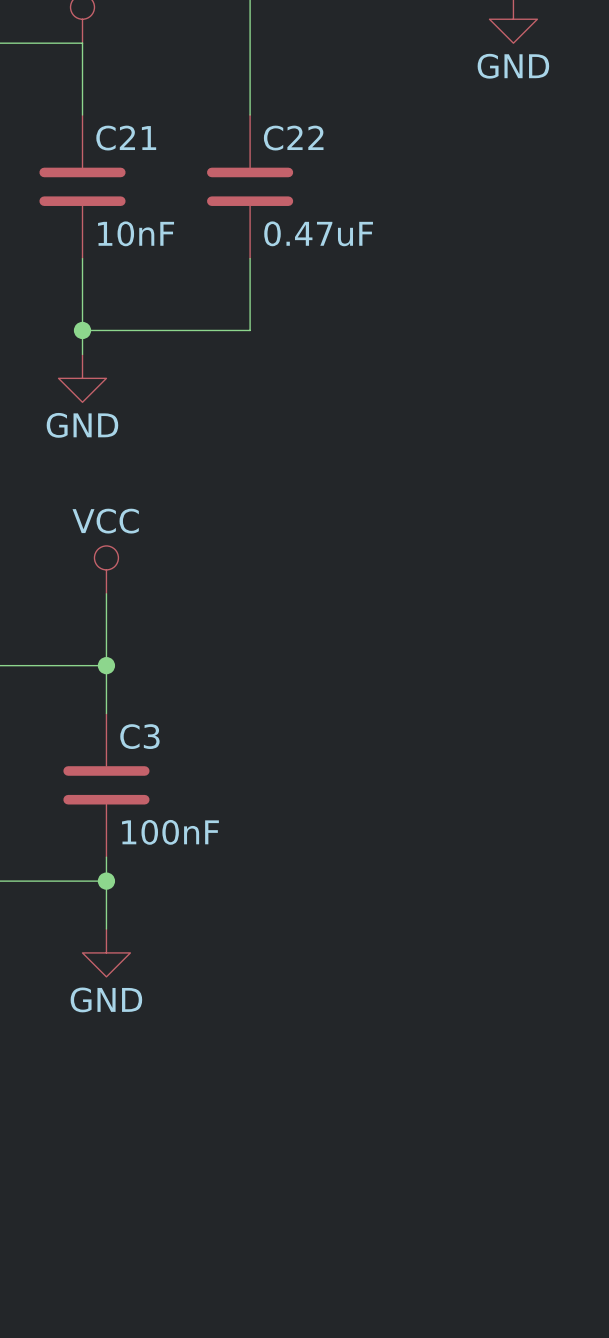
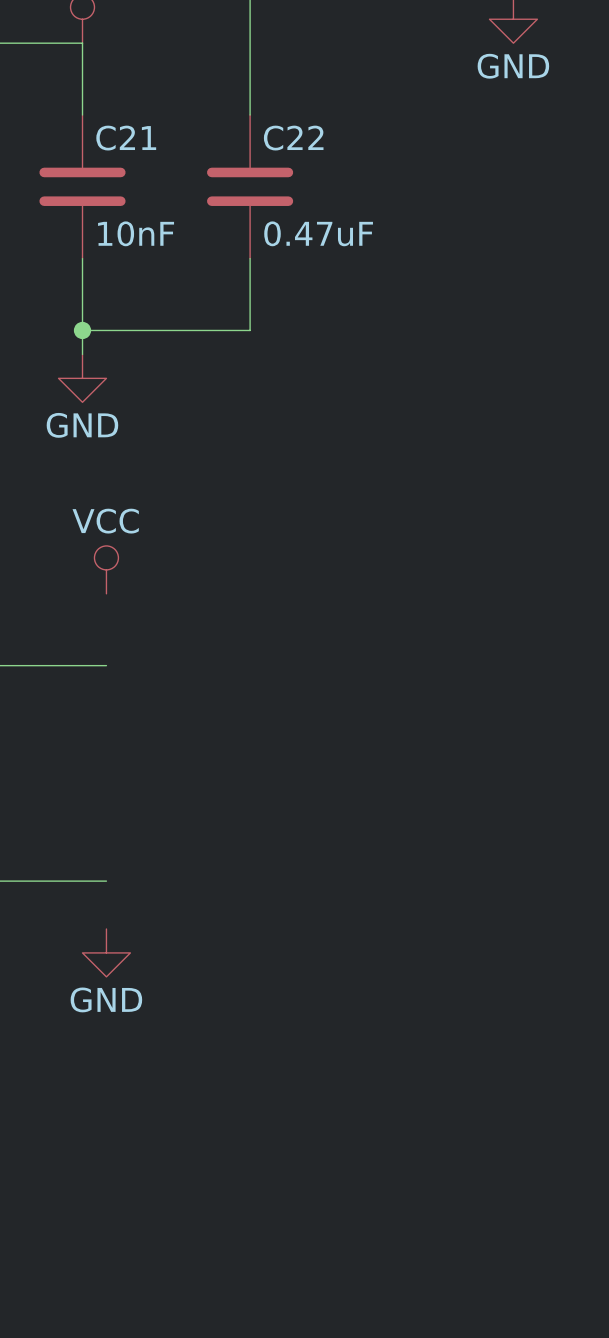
wire: (106, 593) (106, 713) -> none
junction: (106, 665) -> none
C3: 100nF (106, 785) -> none
wire: (106, 857) (106, 928) -> none
junction: (106, 881) -> none

